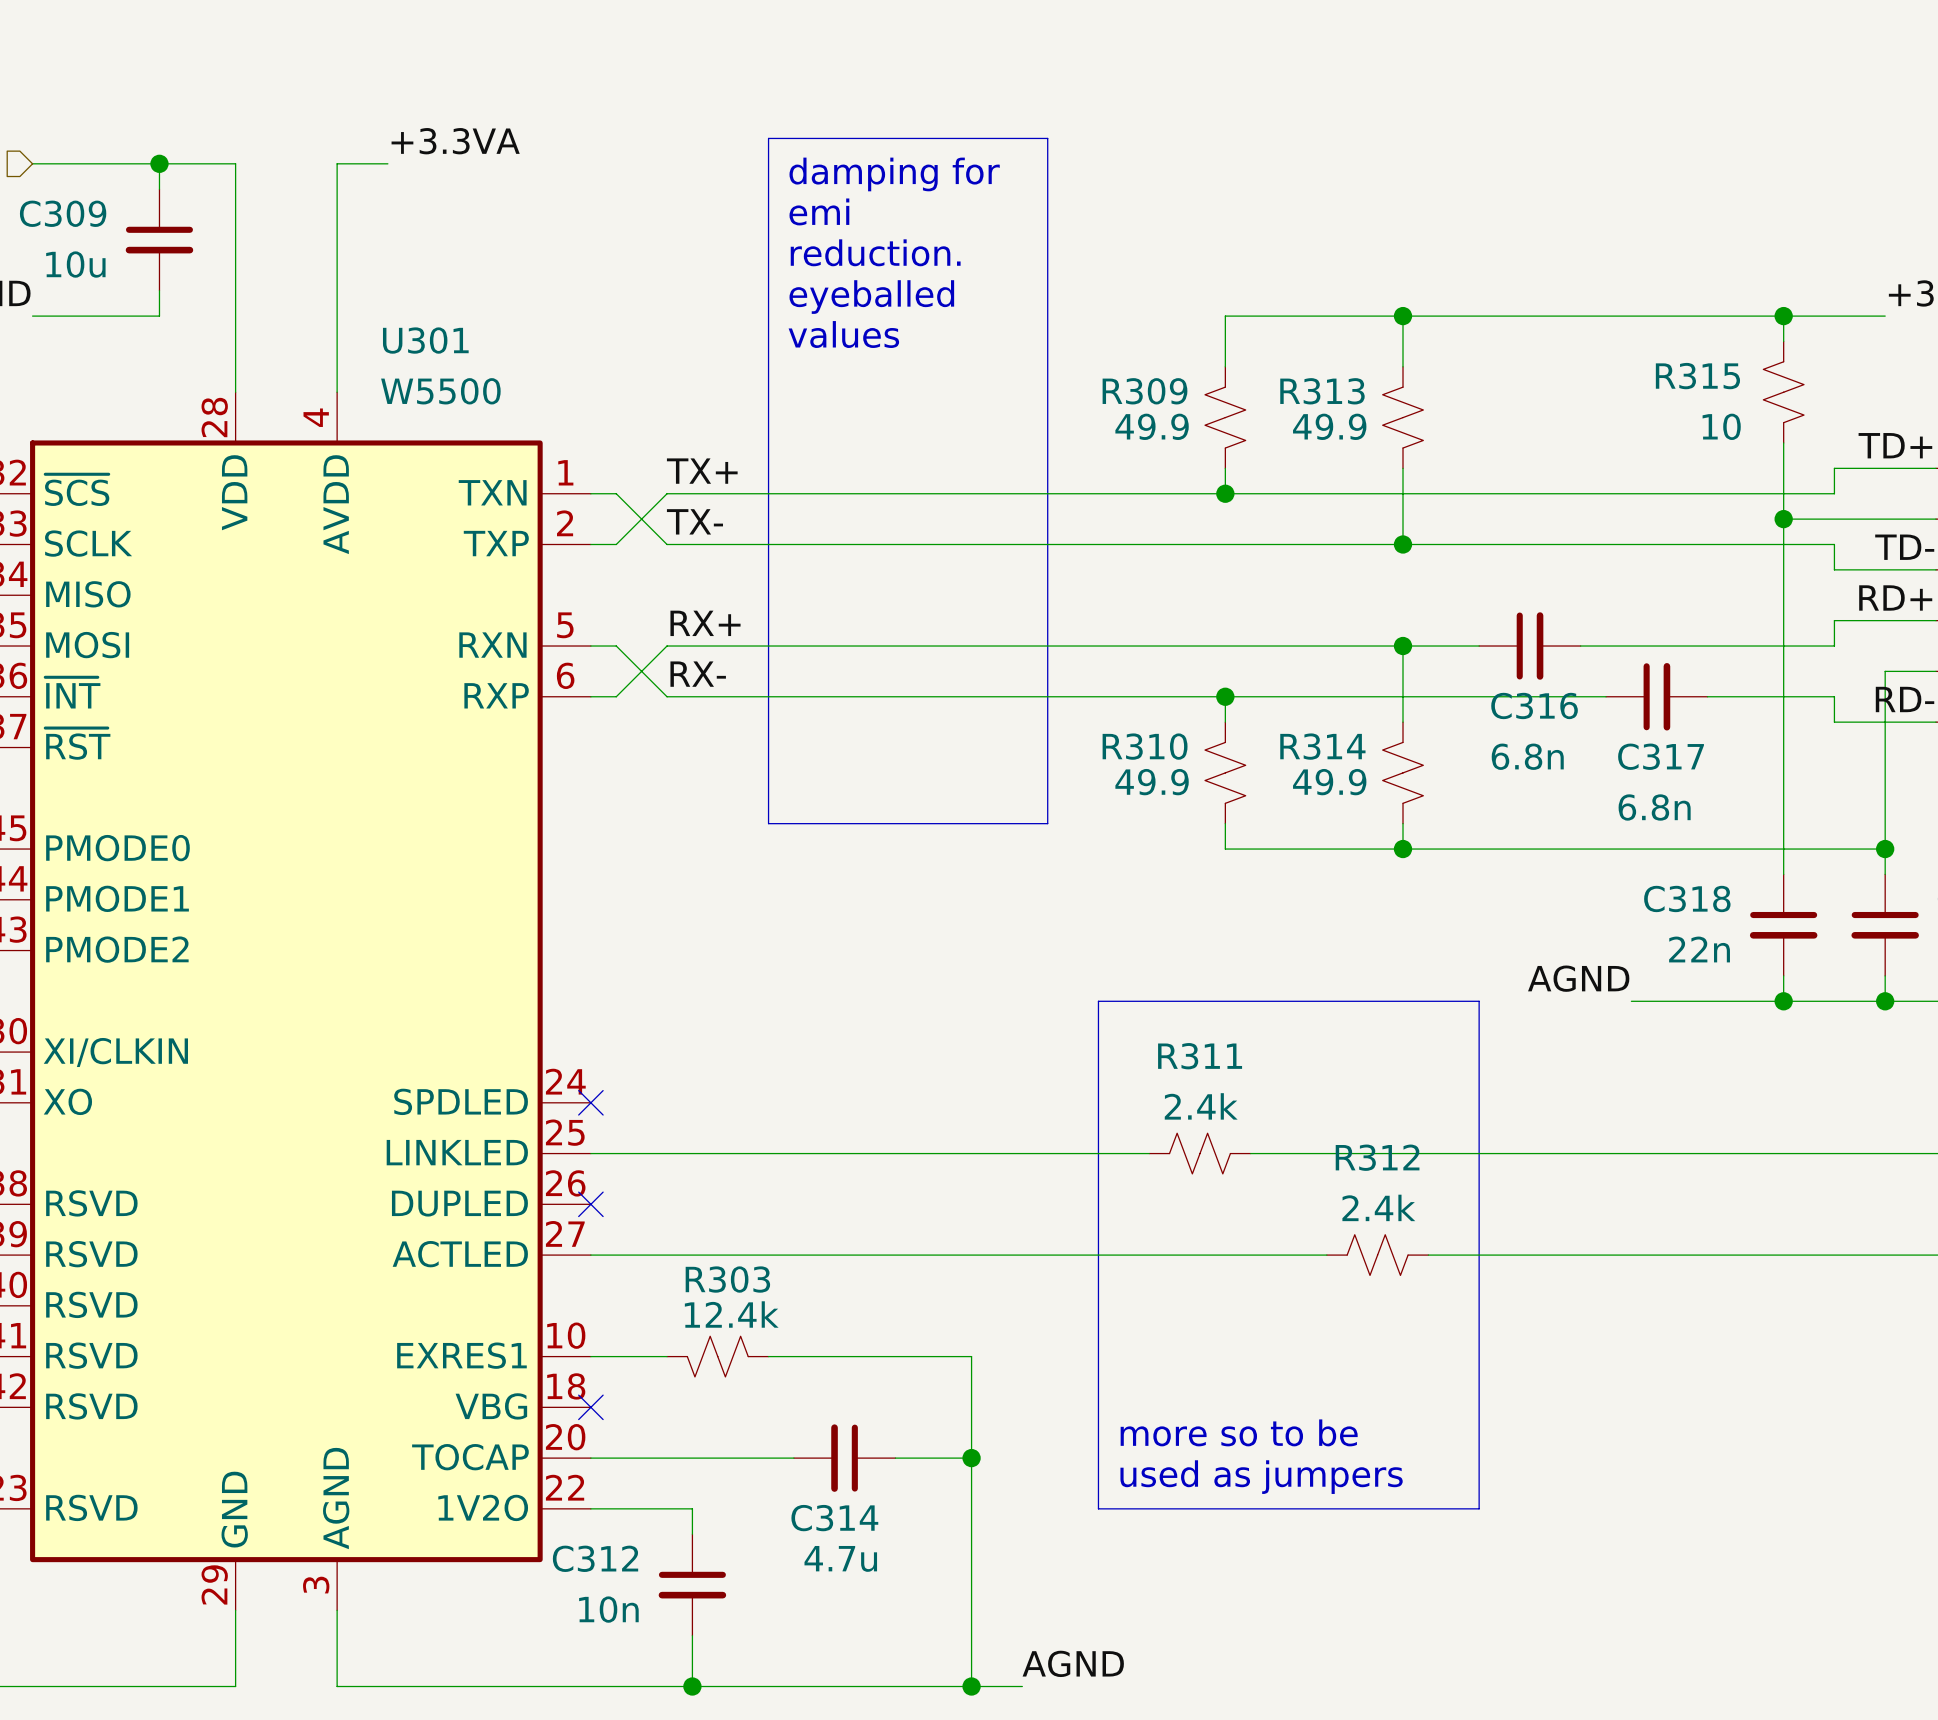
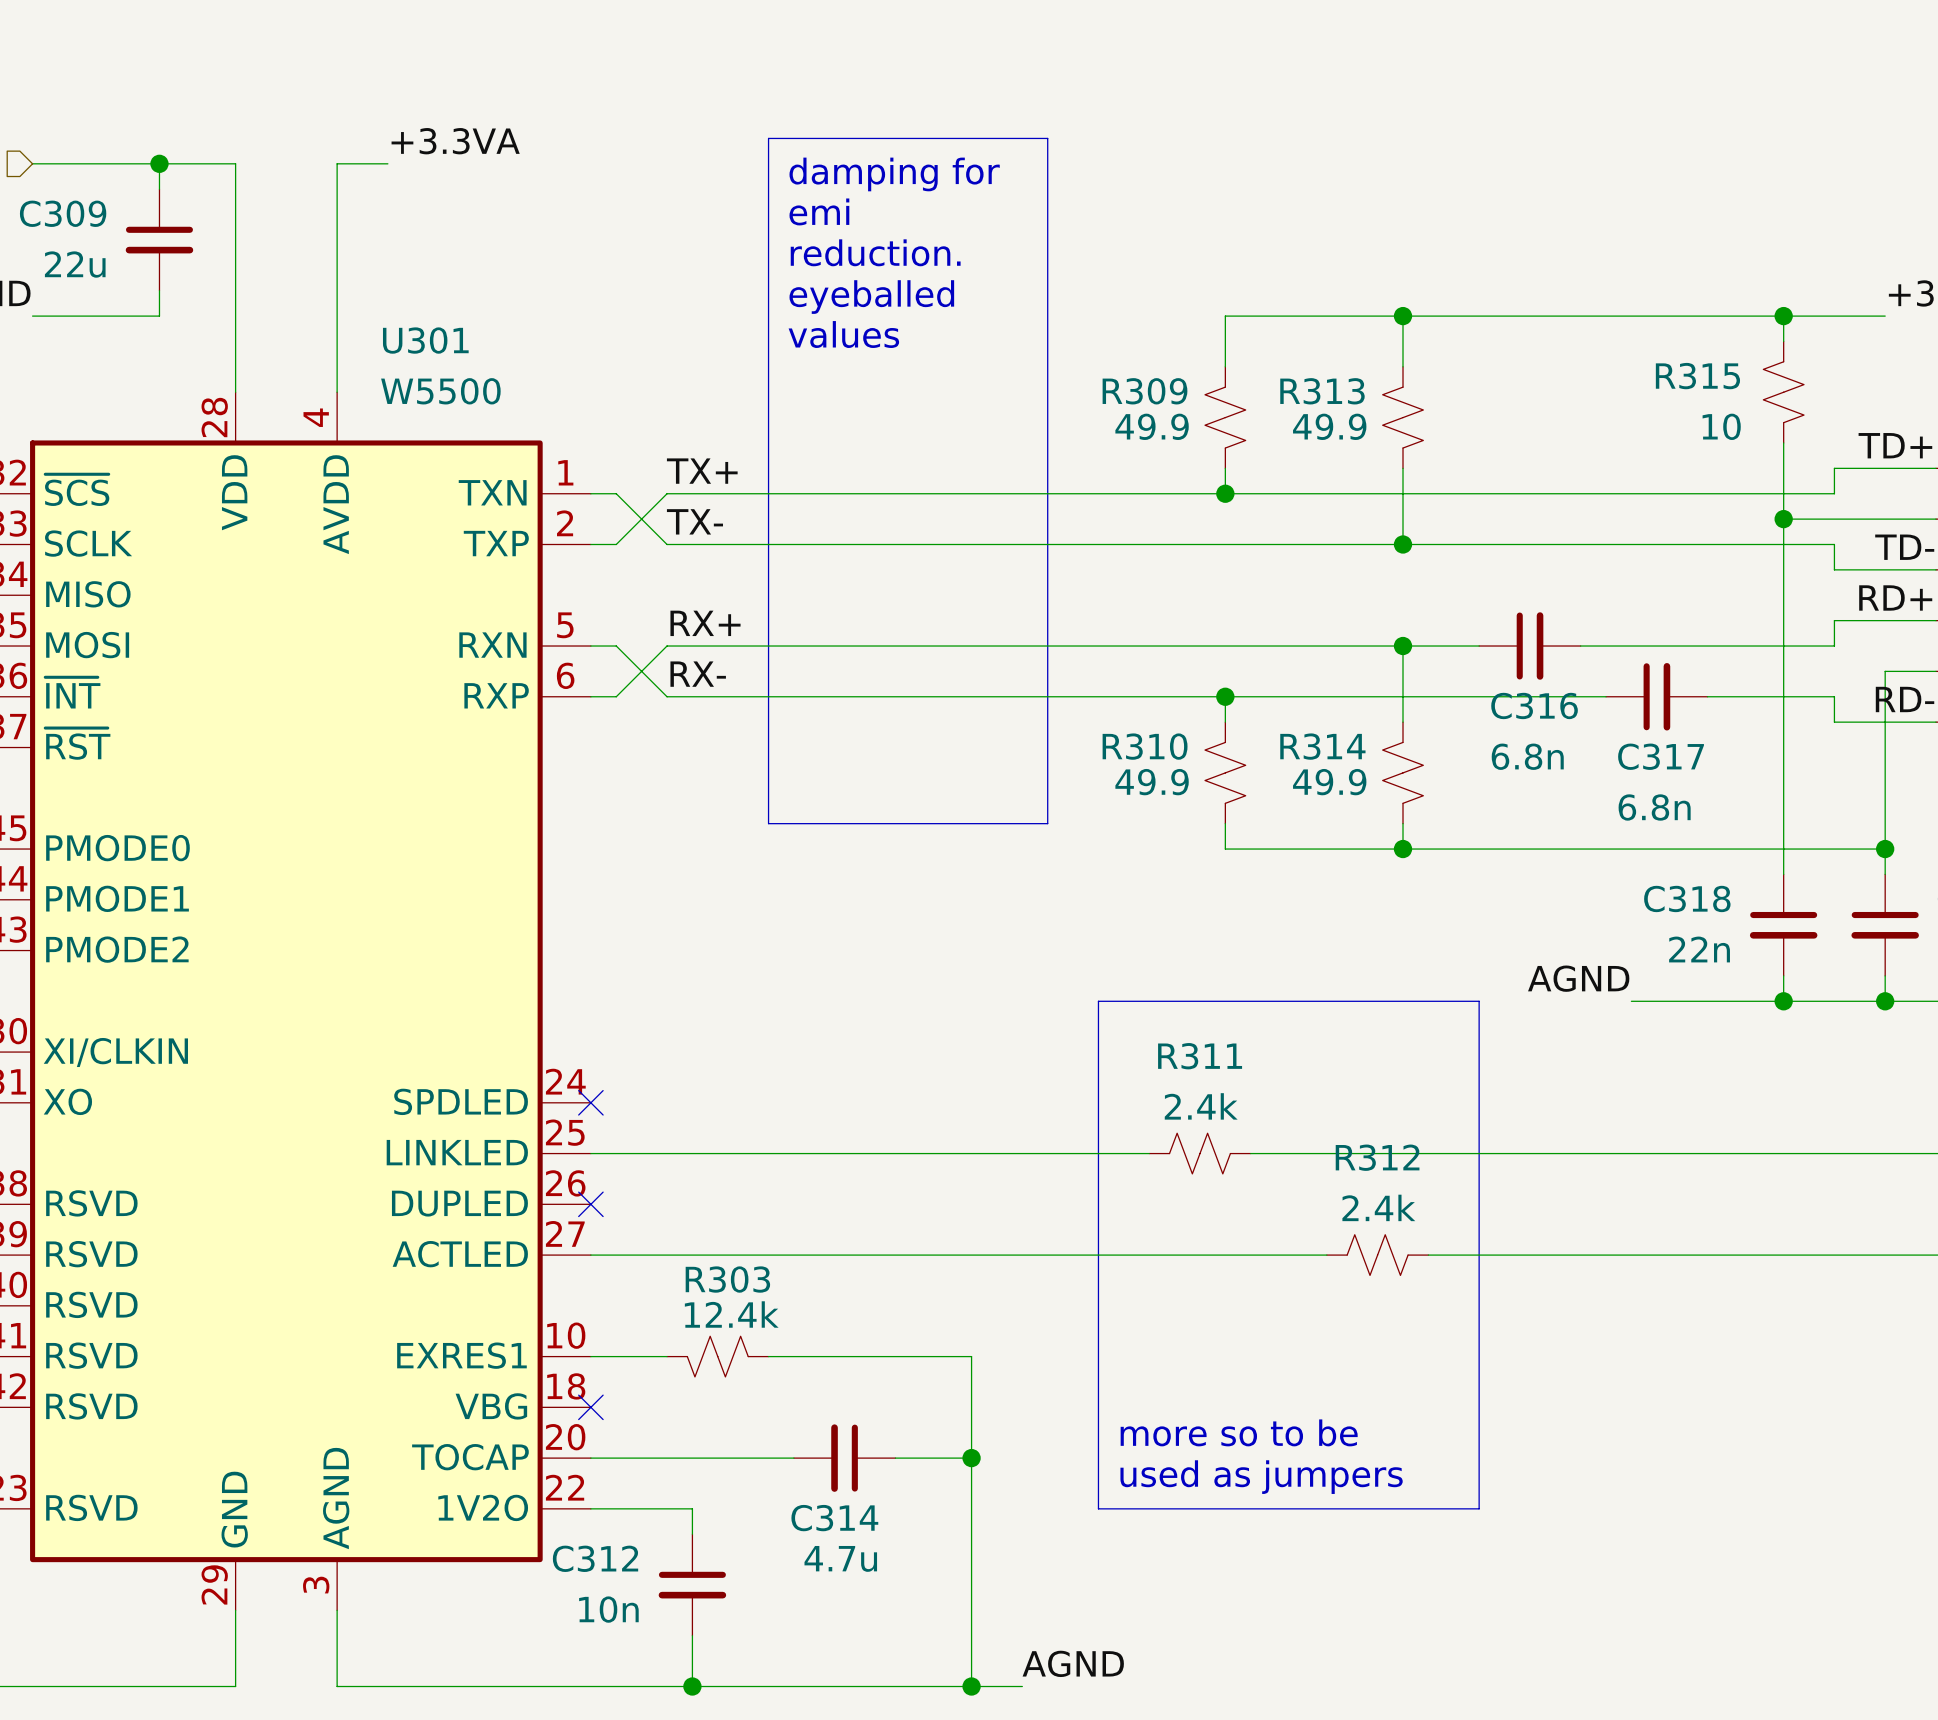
C309 value: 10u (75, 264) -> 22u (75, 264)

